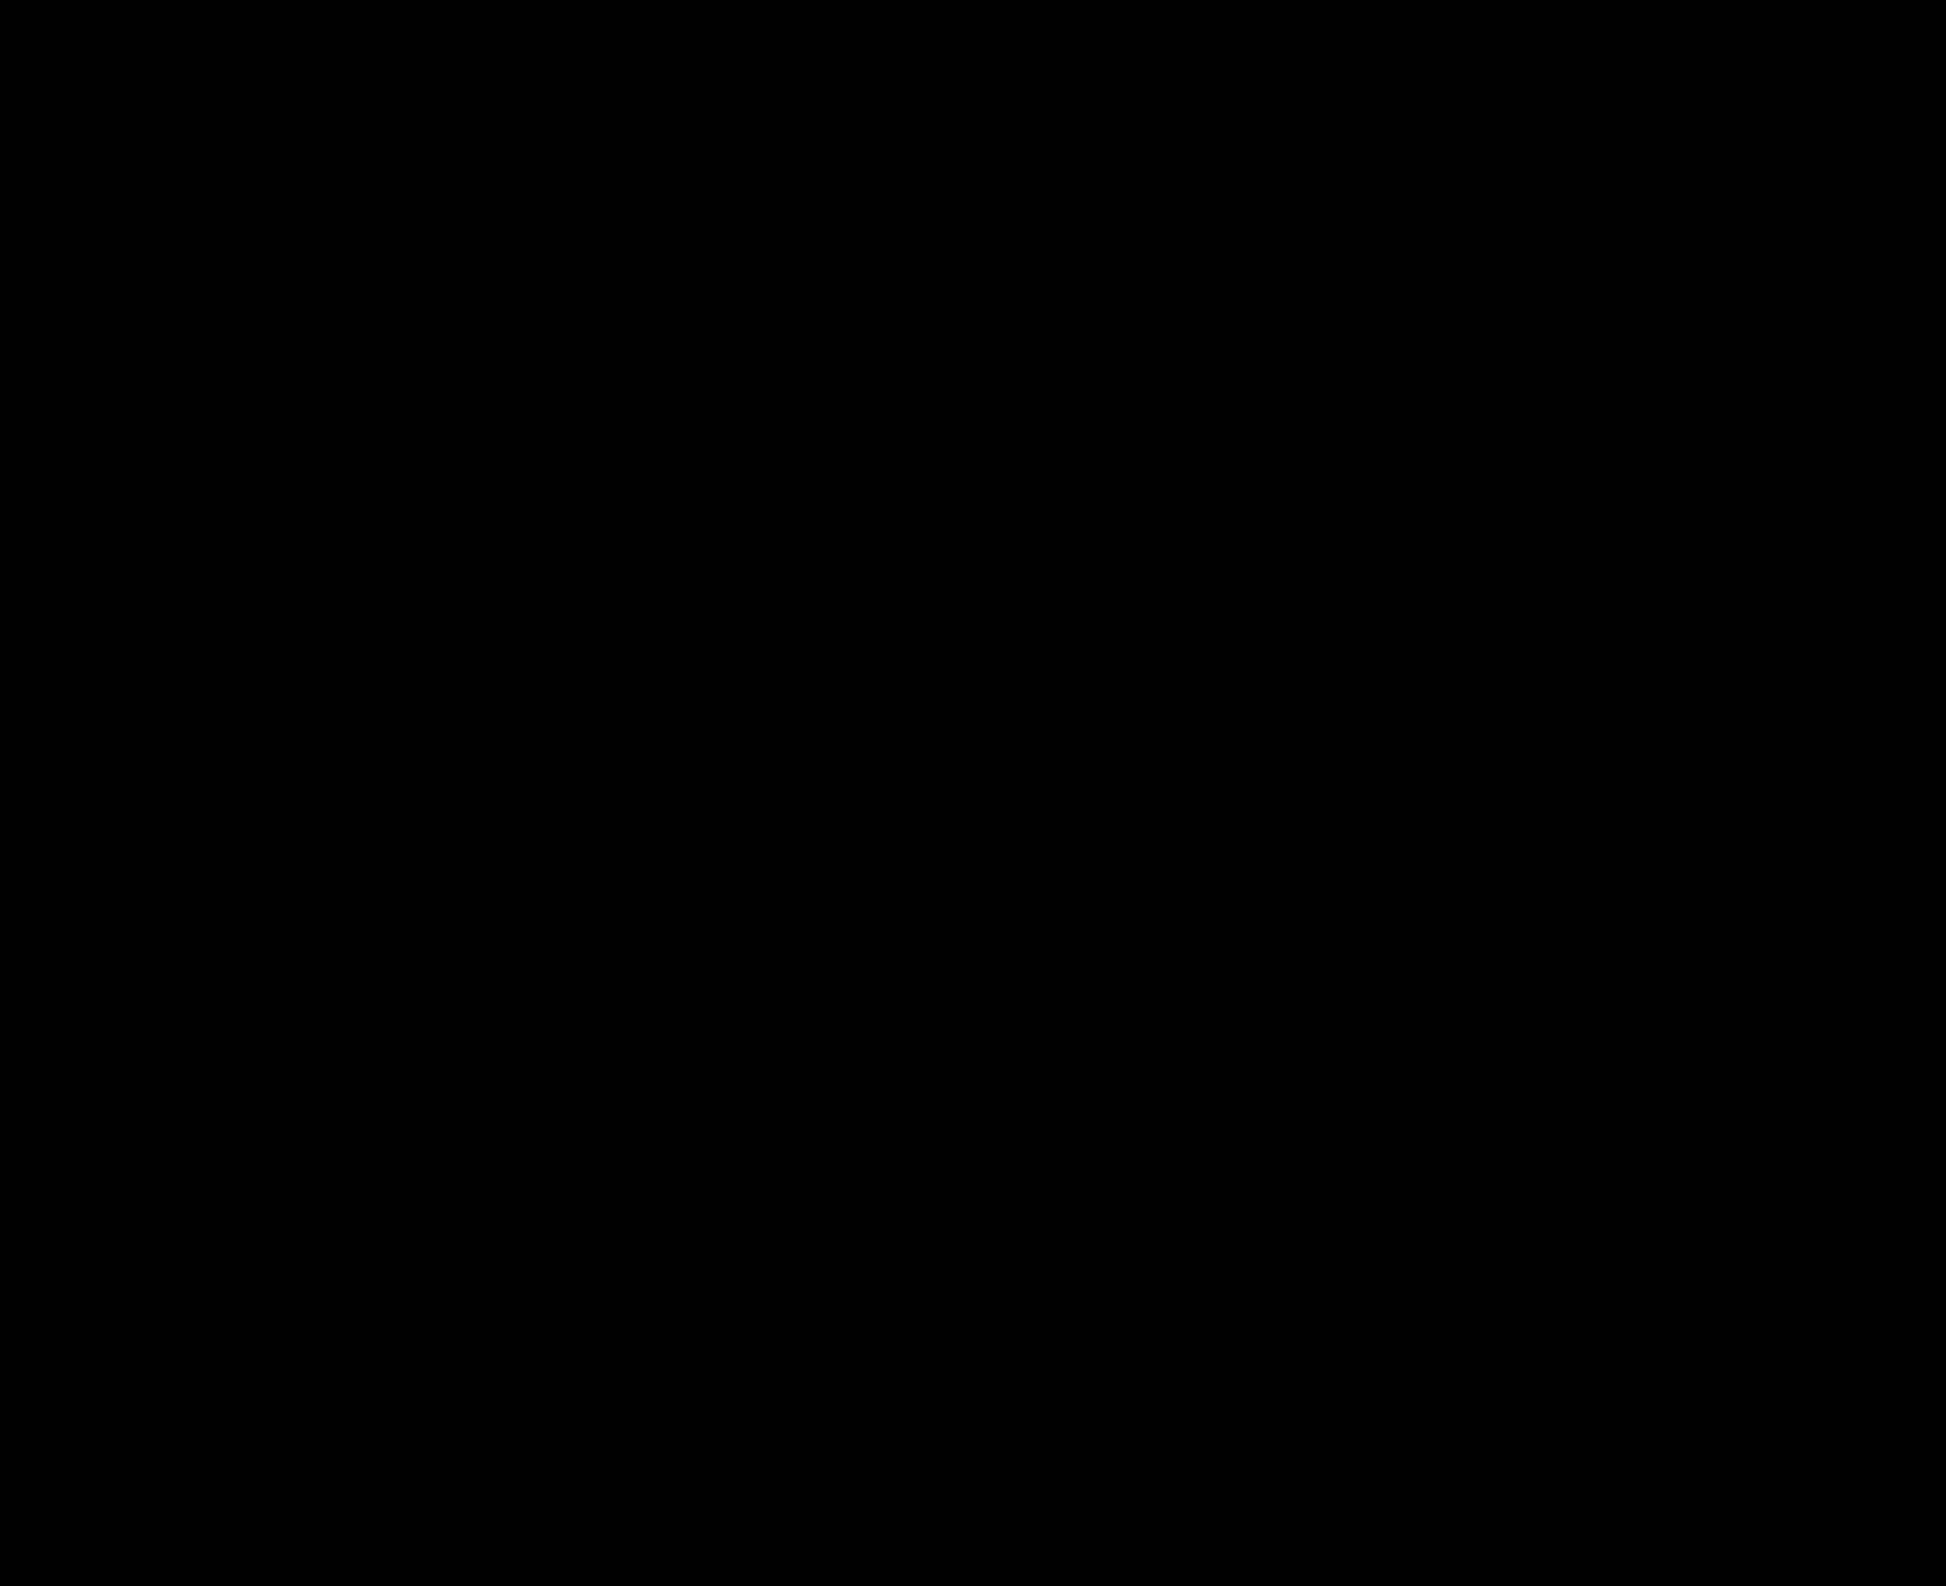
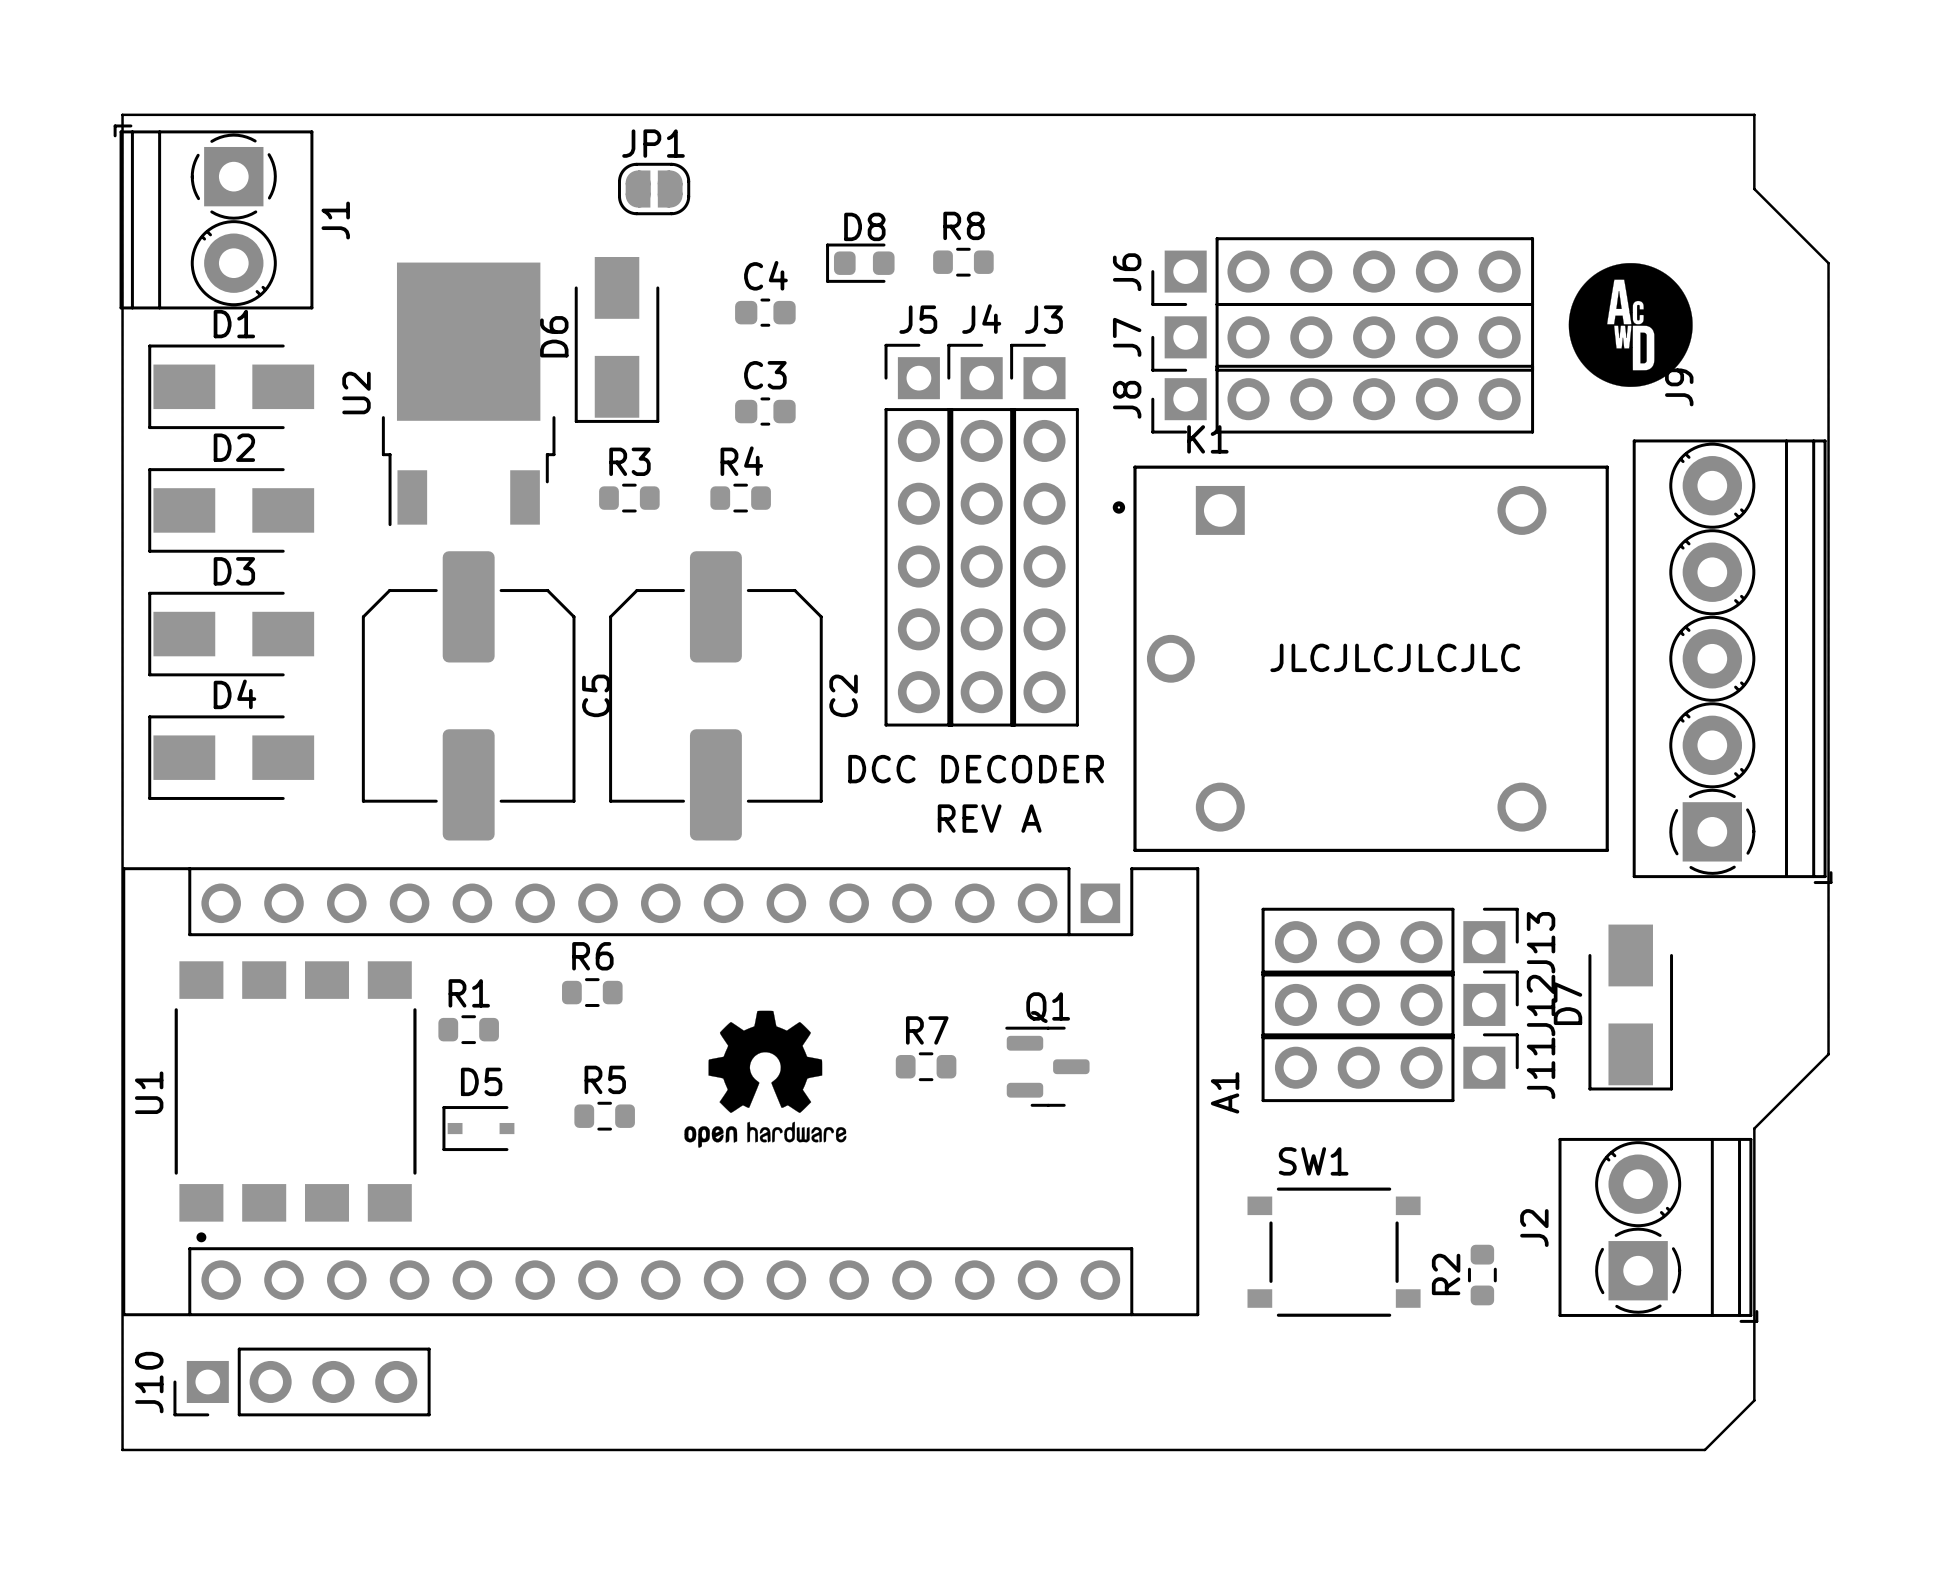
board edge: none -> (122, 114) (122, 1449) (1704, 1449) (1754, 1400) (1754, 1128) (1828, 1054) (1828, 263) (1754, 189) (1754, 114) (122, 114)
JP1: none -> (654, 189)
J1: none -> (213, 216)
R8: none -> (963, 262)
D8: none -> (860, 263)
drawing: none -> [1568, 263, 1693, 387]
J6: none -> (1342, 271)
C4: none -> (765, 312)
J7: none -> (1342, 337)
D6: none -> (617, 339)
D1: none -> (231, 386)
U2: none -> (468, 394)
J8: none -> (1342, 399)
C3: none -> (765, 411)
R3: none -> (629, 498)
R4: none -> (740, 498)
D2: none -> (231, 510)
J5: none -> (918, 535)
J4: none -> (981, 535)
J3: none -> (1044, 535)
D3: none -> (231, 634)
text: none -> JLCJLCJLCJLC (1395, 657)
K1: none -> (1360, 658)
J9: none -> (1732, 661)
C5: none -> (468, 695)
C2: none -> (715, 695)
D4: none -> (231, 757)
text: none -> DCC DECODER (976, 769)
text: none -> REV A (989, 818)
J13: none -> (1390, 942)
R6: none -> (592, 992)
J12: none -> (1390, 1004)
D7: none -> (1630, 1007)
drawing: none -> [684, 1010, 847, 1148]
R1: none -> (468, 1029)
R7: none -> (926, 1066)
Q1: none -> (1047, 1066)
J11: none -> (1390, 1067)
A1: none -> (660, 1091)
U1: none -> (295, 1101)
R5: none -> (604, 1116)
D5: none -> (478, 1128)
J2: none -> (1658, 1230)
SW1: none -> (1334, 1252)
R2: none -> (1482, 1275)
J10: none -> (302, 1381)

